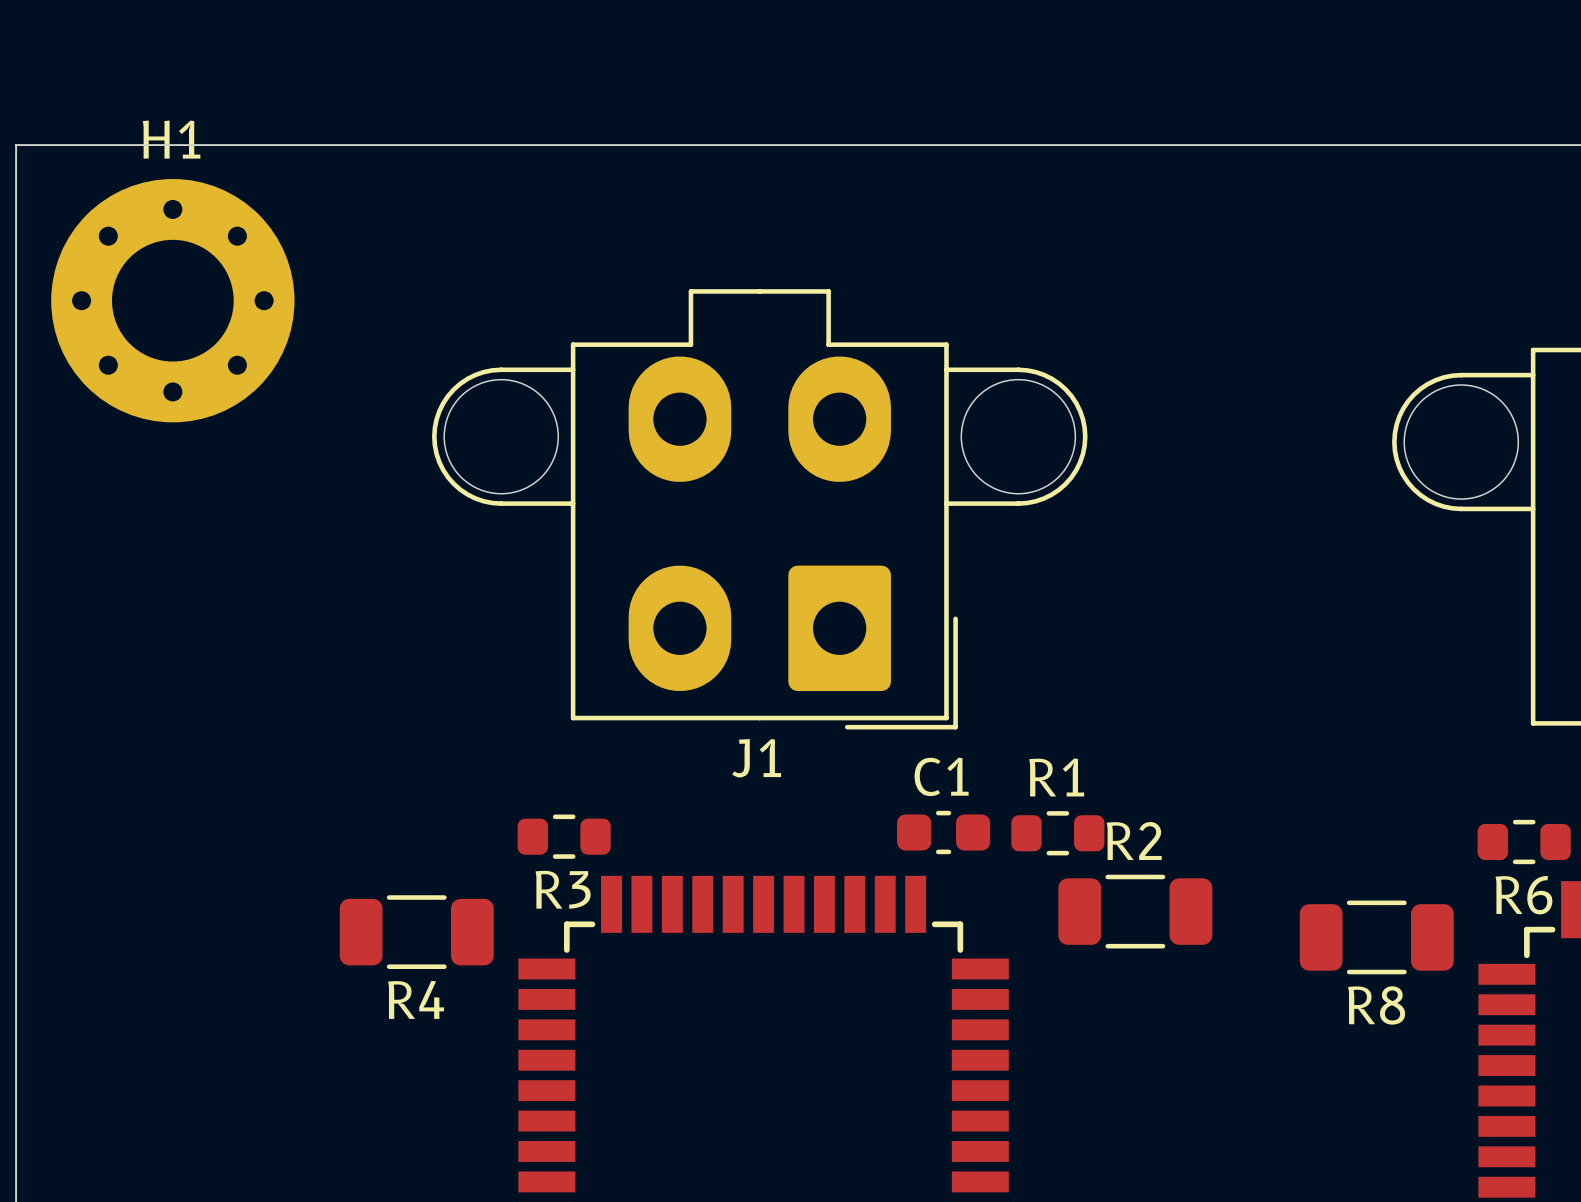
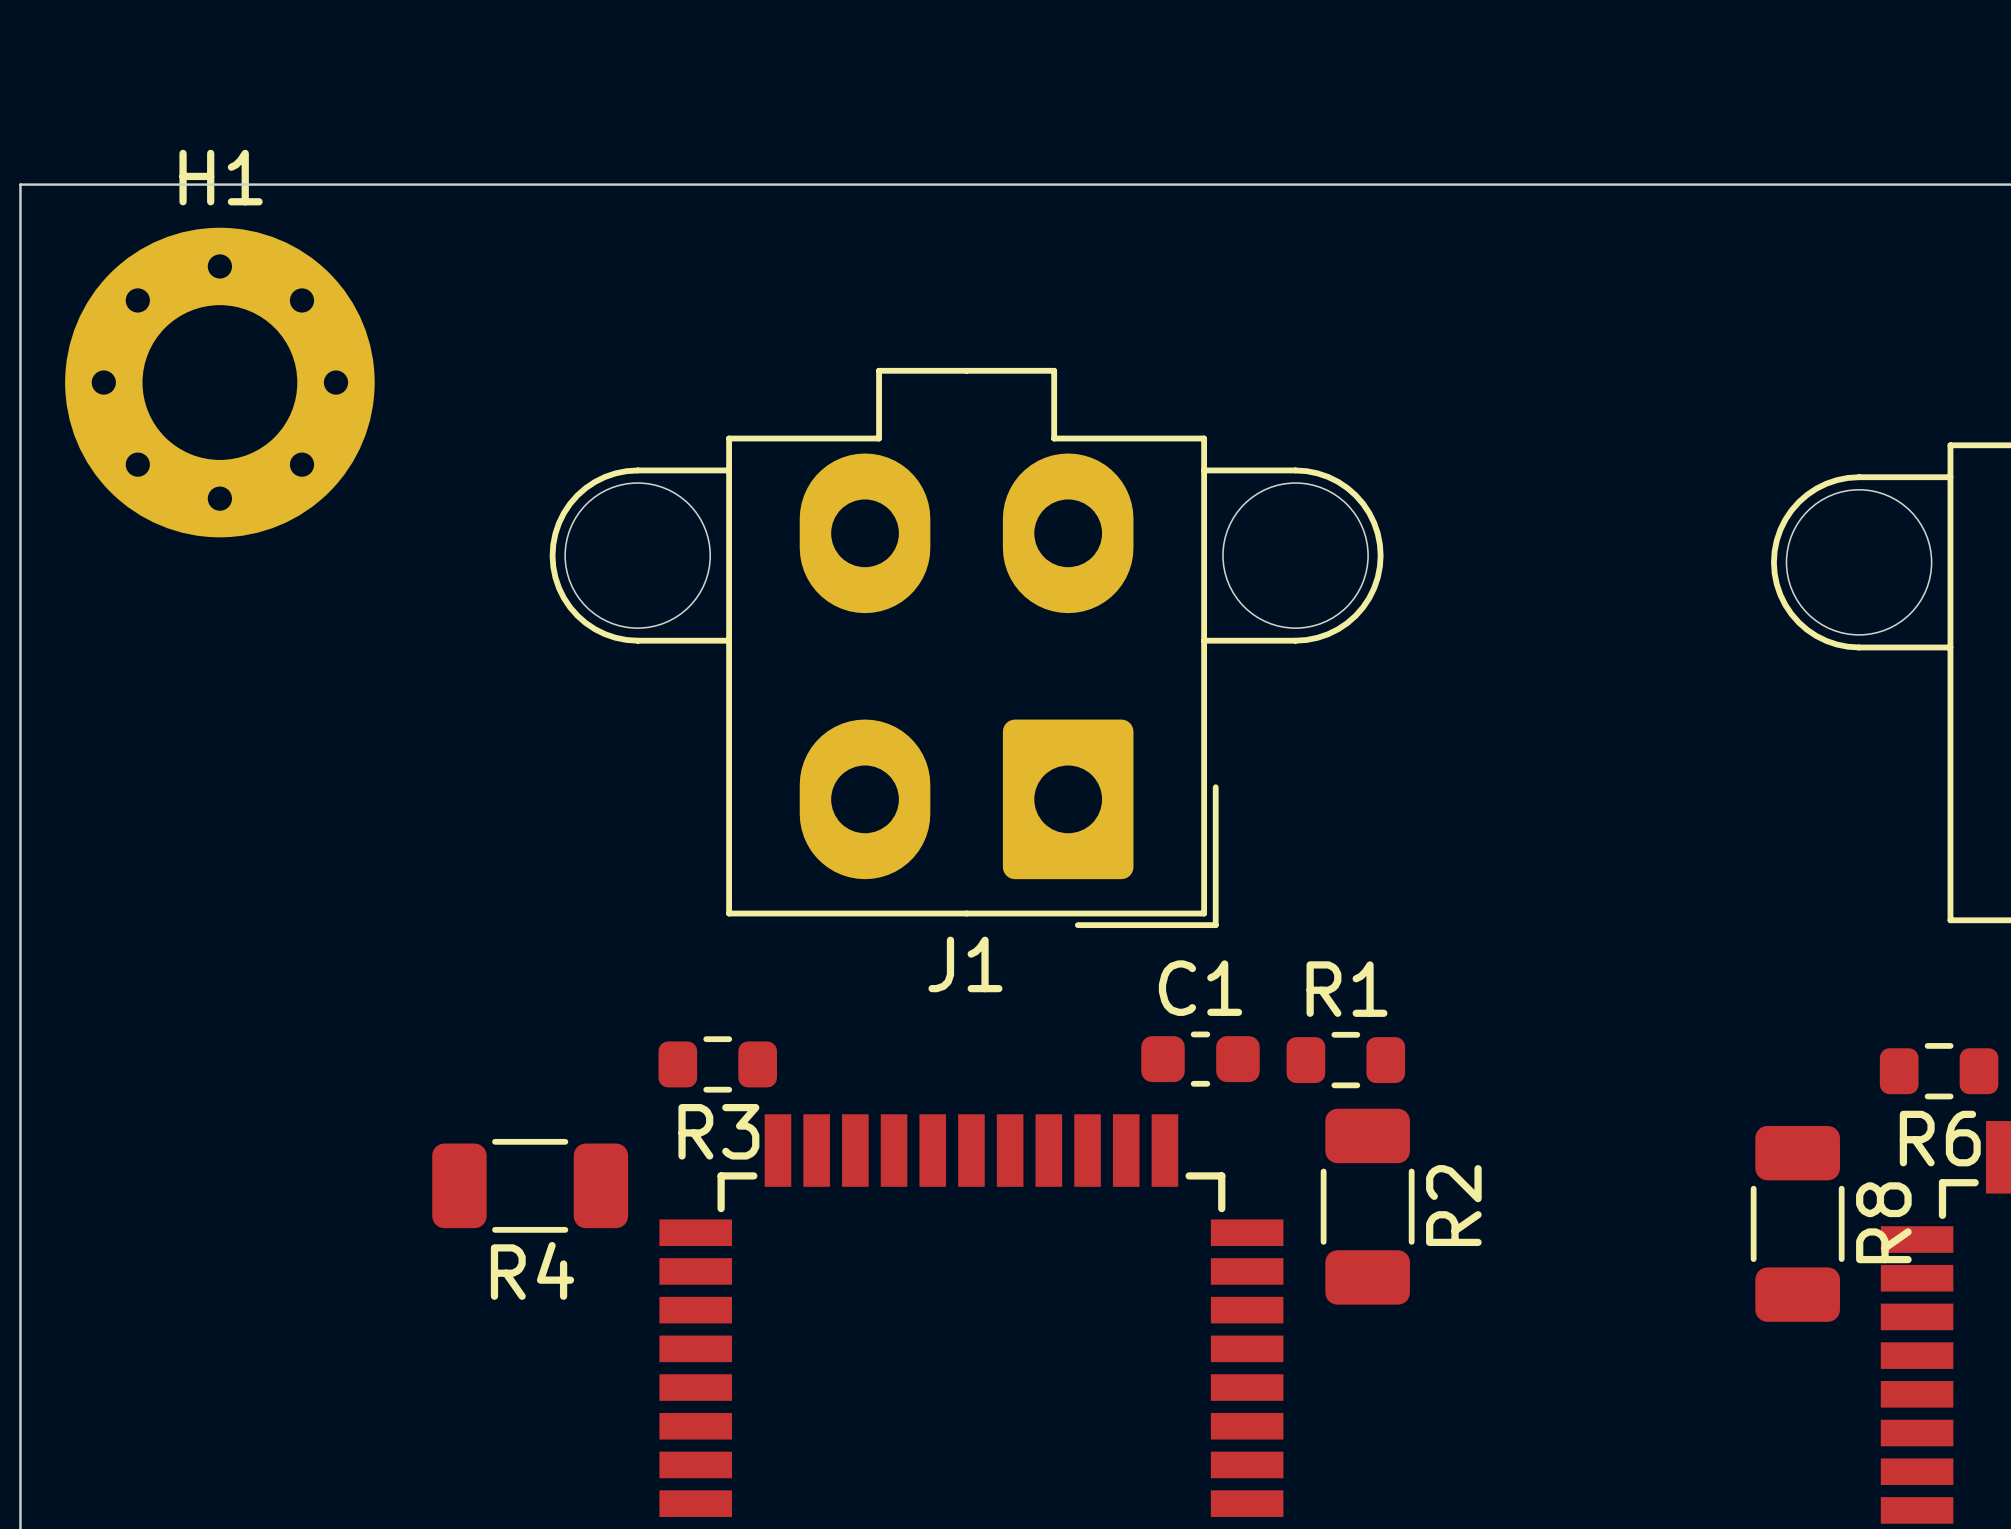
R2 rotation: 0° (1135, 911) -> 90° clockwise (1367, 1206)
R8 rotation: 0° (1376, 937) -> 90° clockwise (1797, 1223)
R8 name position: R8 (1376, 1005) -> R8 (1883, 1222)

